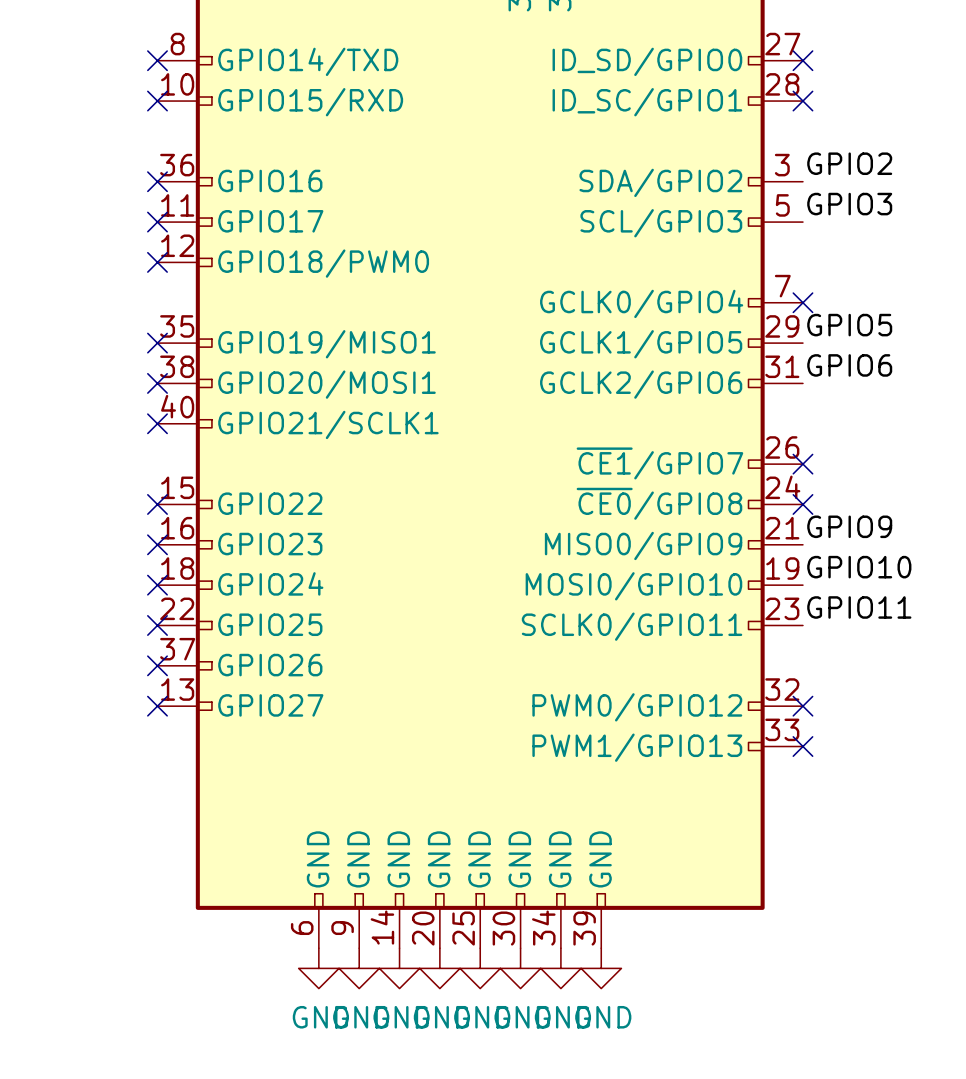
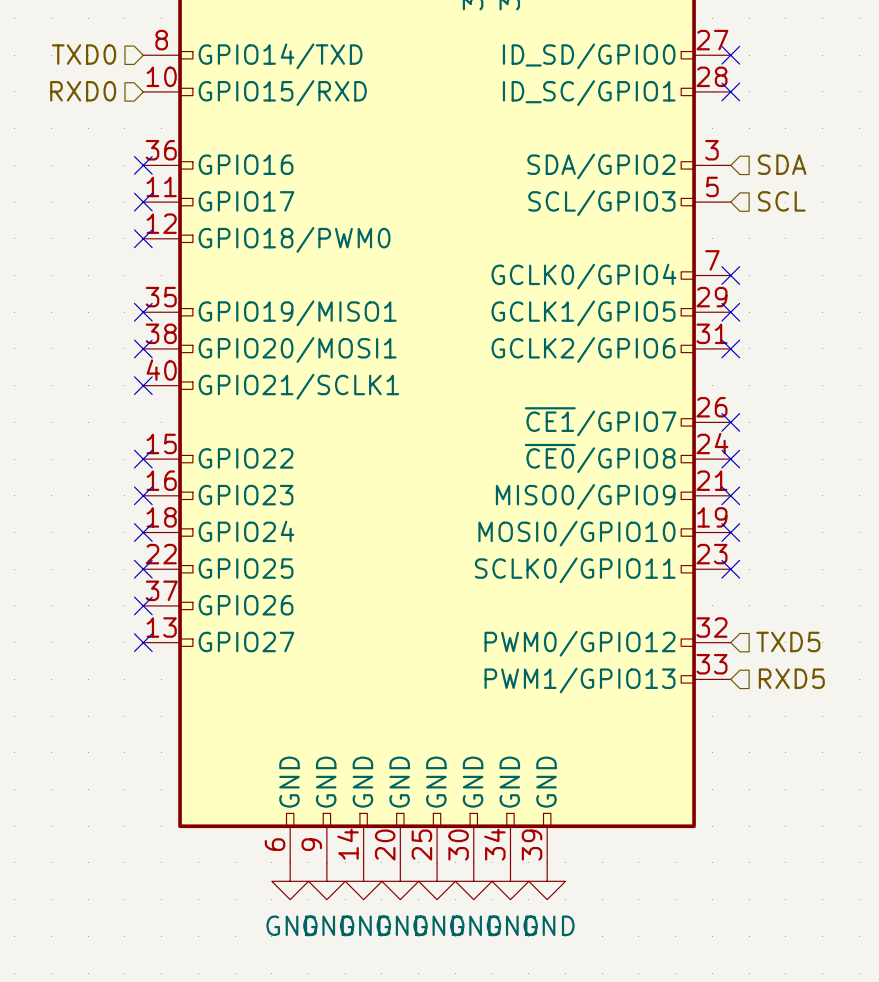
hierarchical label: none -> TXD0 (84, 54)
no-connect mark: (157, 60) -> none
hierarchical label: none -> RXD0 (83, 91)
no-connect mark: (157, 101) -> none
label: GPIO2 (849, 163) -> none
hierarchical label: none -> SDA (782, 164)
label: GPIO3 (849, 204) -> none
hierarchical label: none -> SCL (781, 201)
label: GPIO5 (849, 325) -> none
no-connect mark: none -> (730, 312)
label: GPIO6 (849, 365) -> none
no-connect mark: none -> (730, 348)
label: GPIO9 (849, 526) -> none
no-connect mark: none -> (730, 495)
label: GPIO10 (859, 567) -> none
no-connect mark: none -> (730, 532)
label: GPIO11 (859, 607) -> none
no-connect mark: none -> (730, 569)
hierarchical label: none -> TXD5 (788, 641)
no-connect mark: (802, 706) -> none
hierarchical label: none -> RXD5 (791, 678)
no-connect mark: (802, 746) -> none

